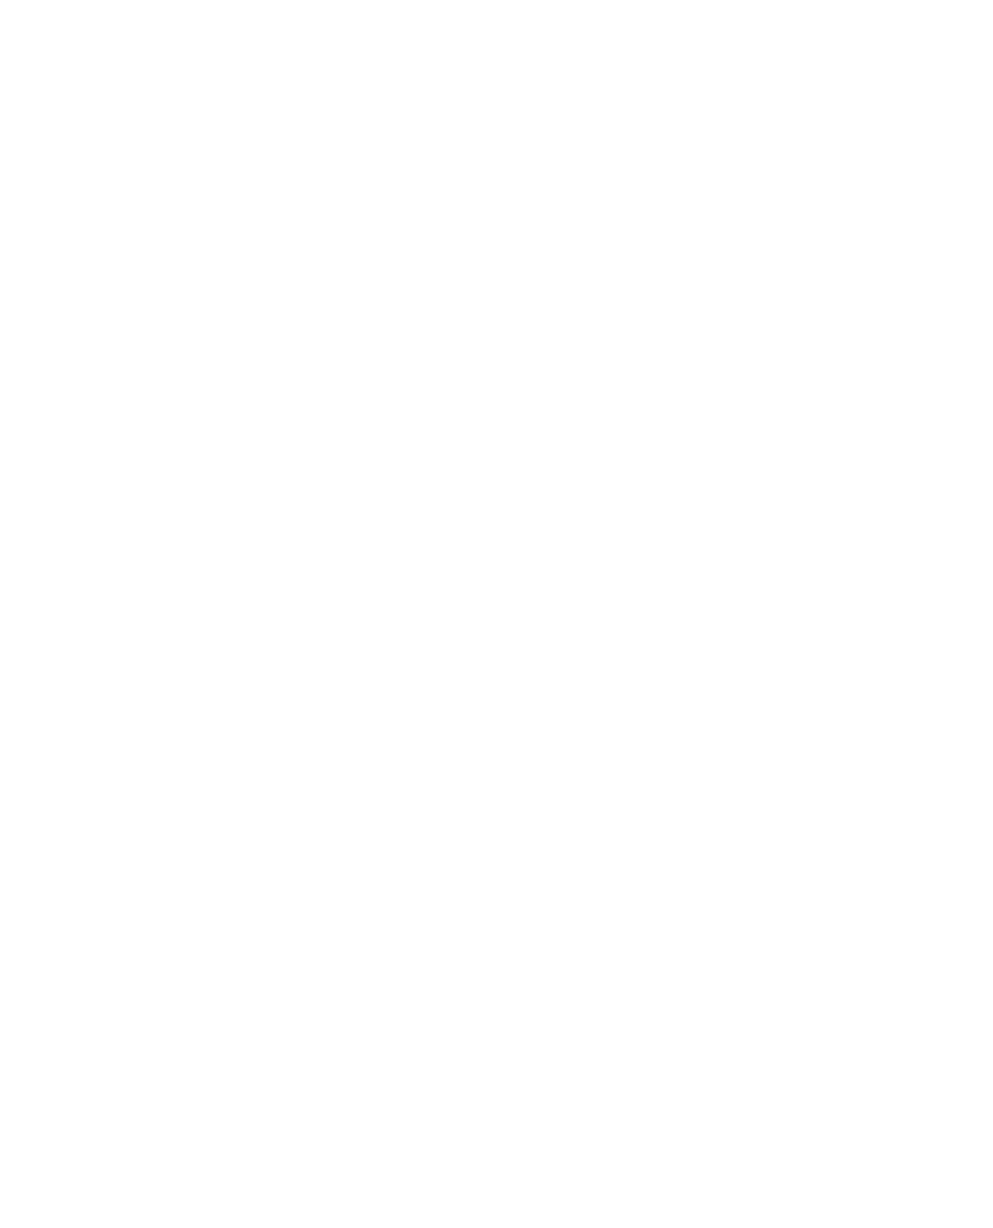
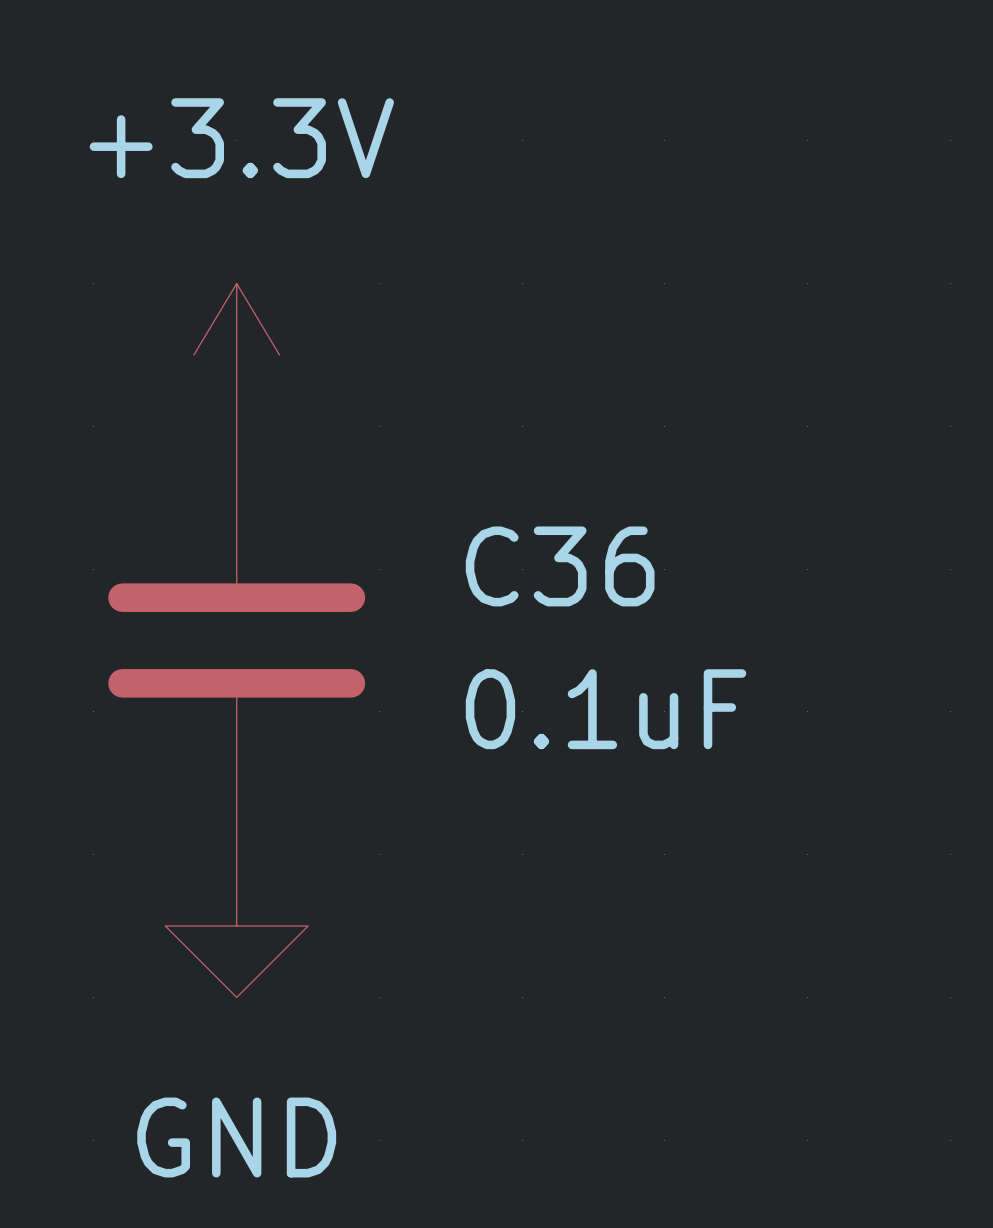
power symbol: none -> +3.3V (236, 354)
C36: none -> 0.1uF (236, 640)
power symbol: none -> GND (236, 926)

